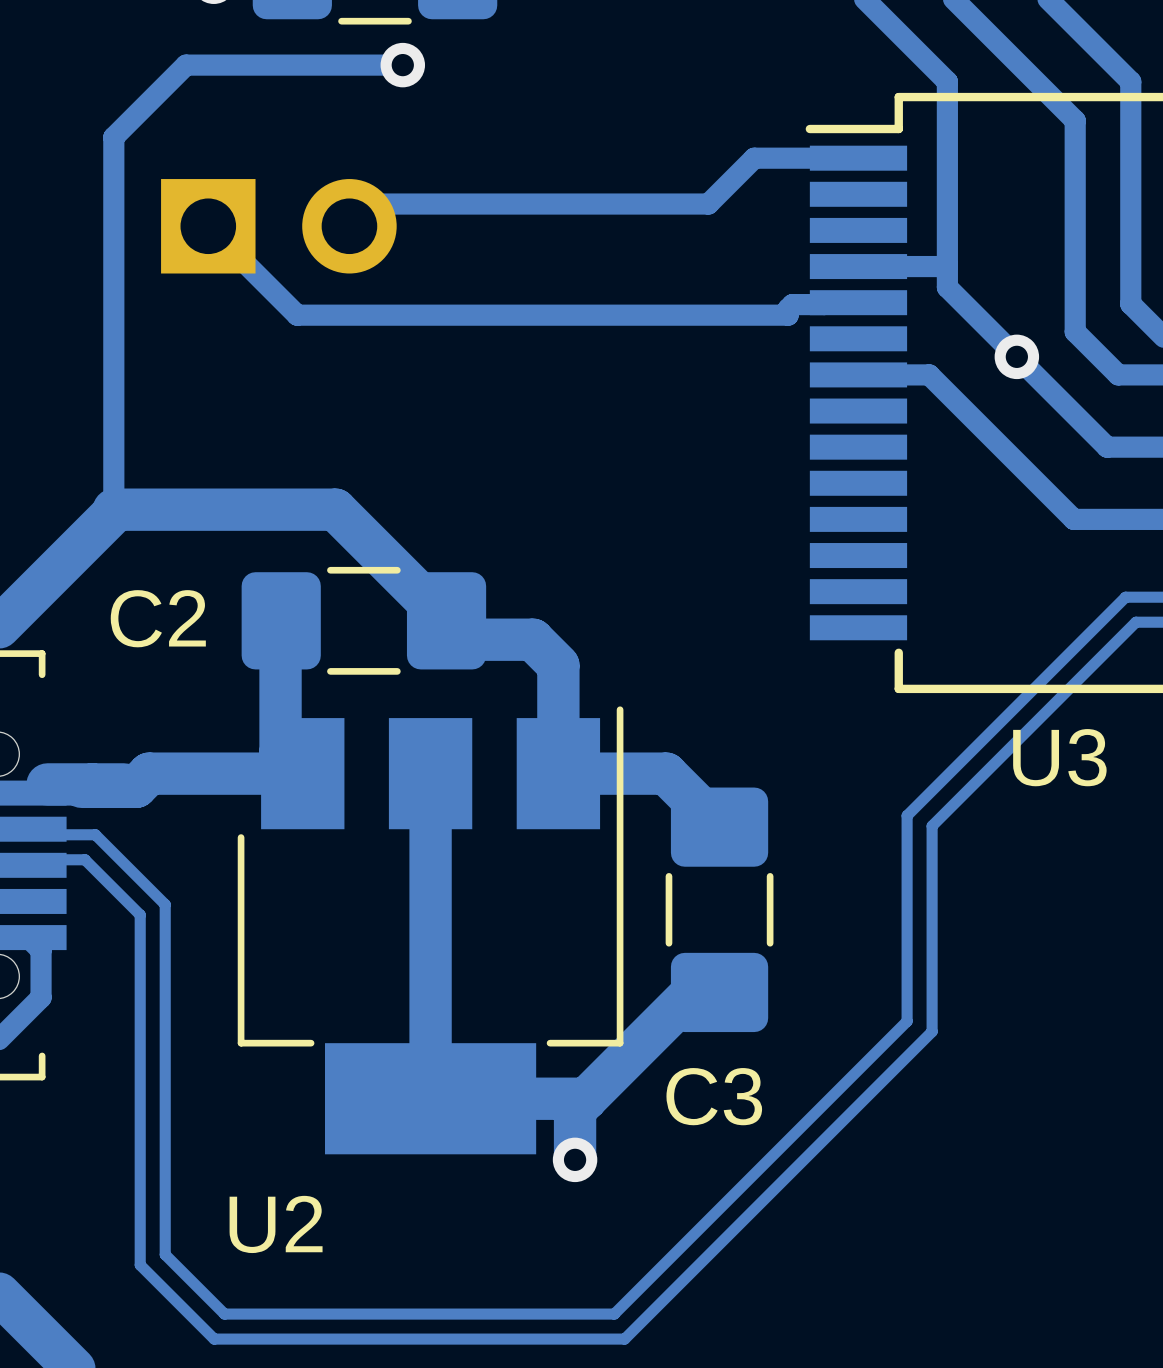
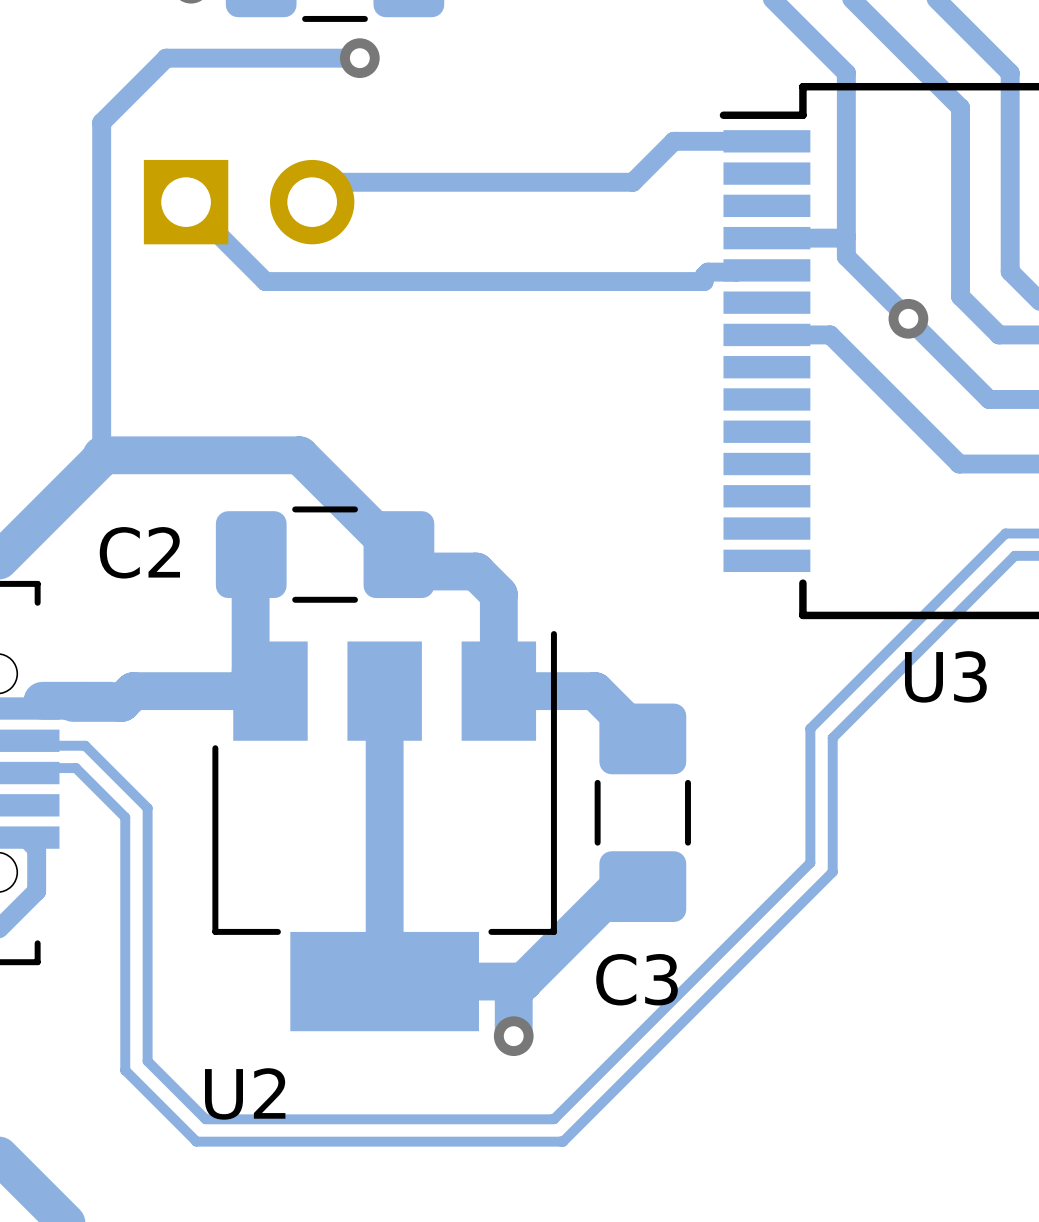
track: (907, 965) (907, 1021) (614, 1314) (224, 1314) (165, 1254) (165, 1187) -> (810, 862) (553, 1118)
track: (932, 976) (932, 1031) (624, 1339) (214, 1339) (140, 1265) (140, 1198) -> (832, 872) (563, 1141) (560, 1141)
track: none -> (147, 1061) (205, 1118)
track: none -> (125, 1070) (196, 1141)
track: none -> (553, 1119) (205, 1119)
track: none -> (563, 1141) (196, 1141)

